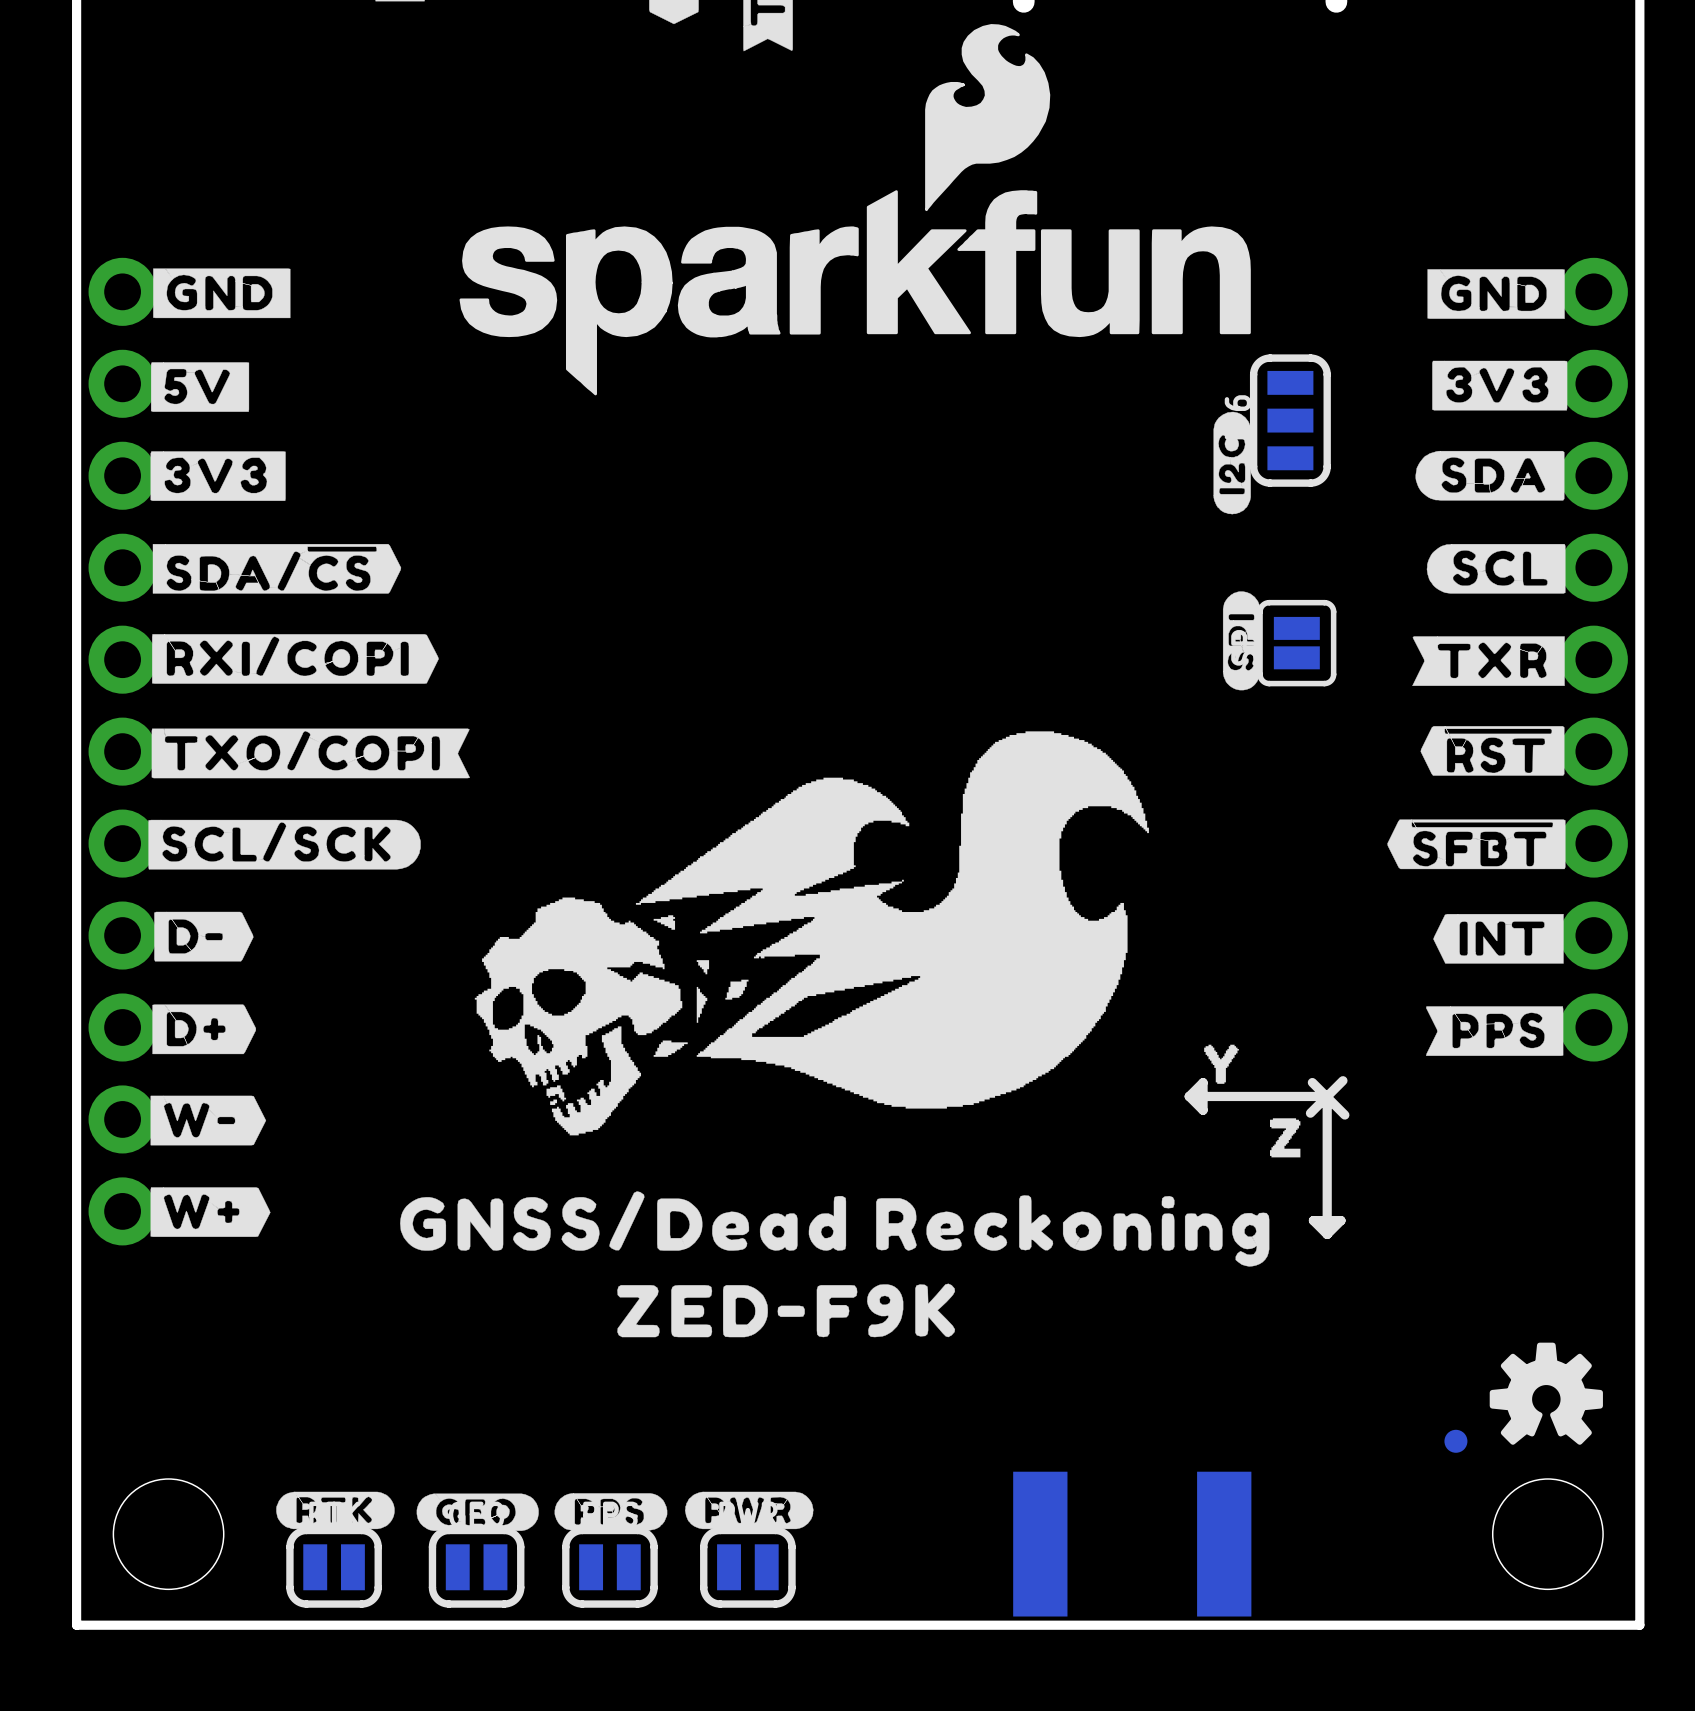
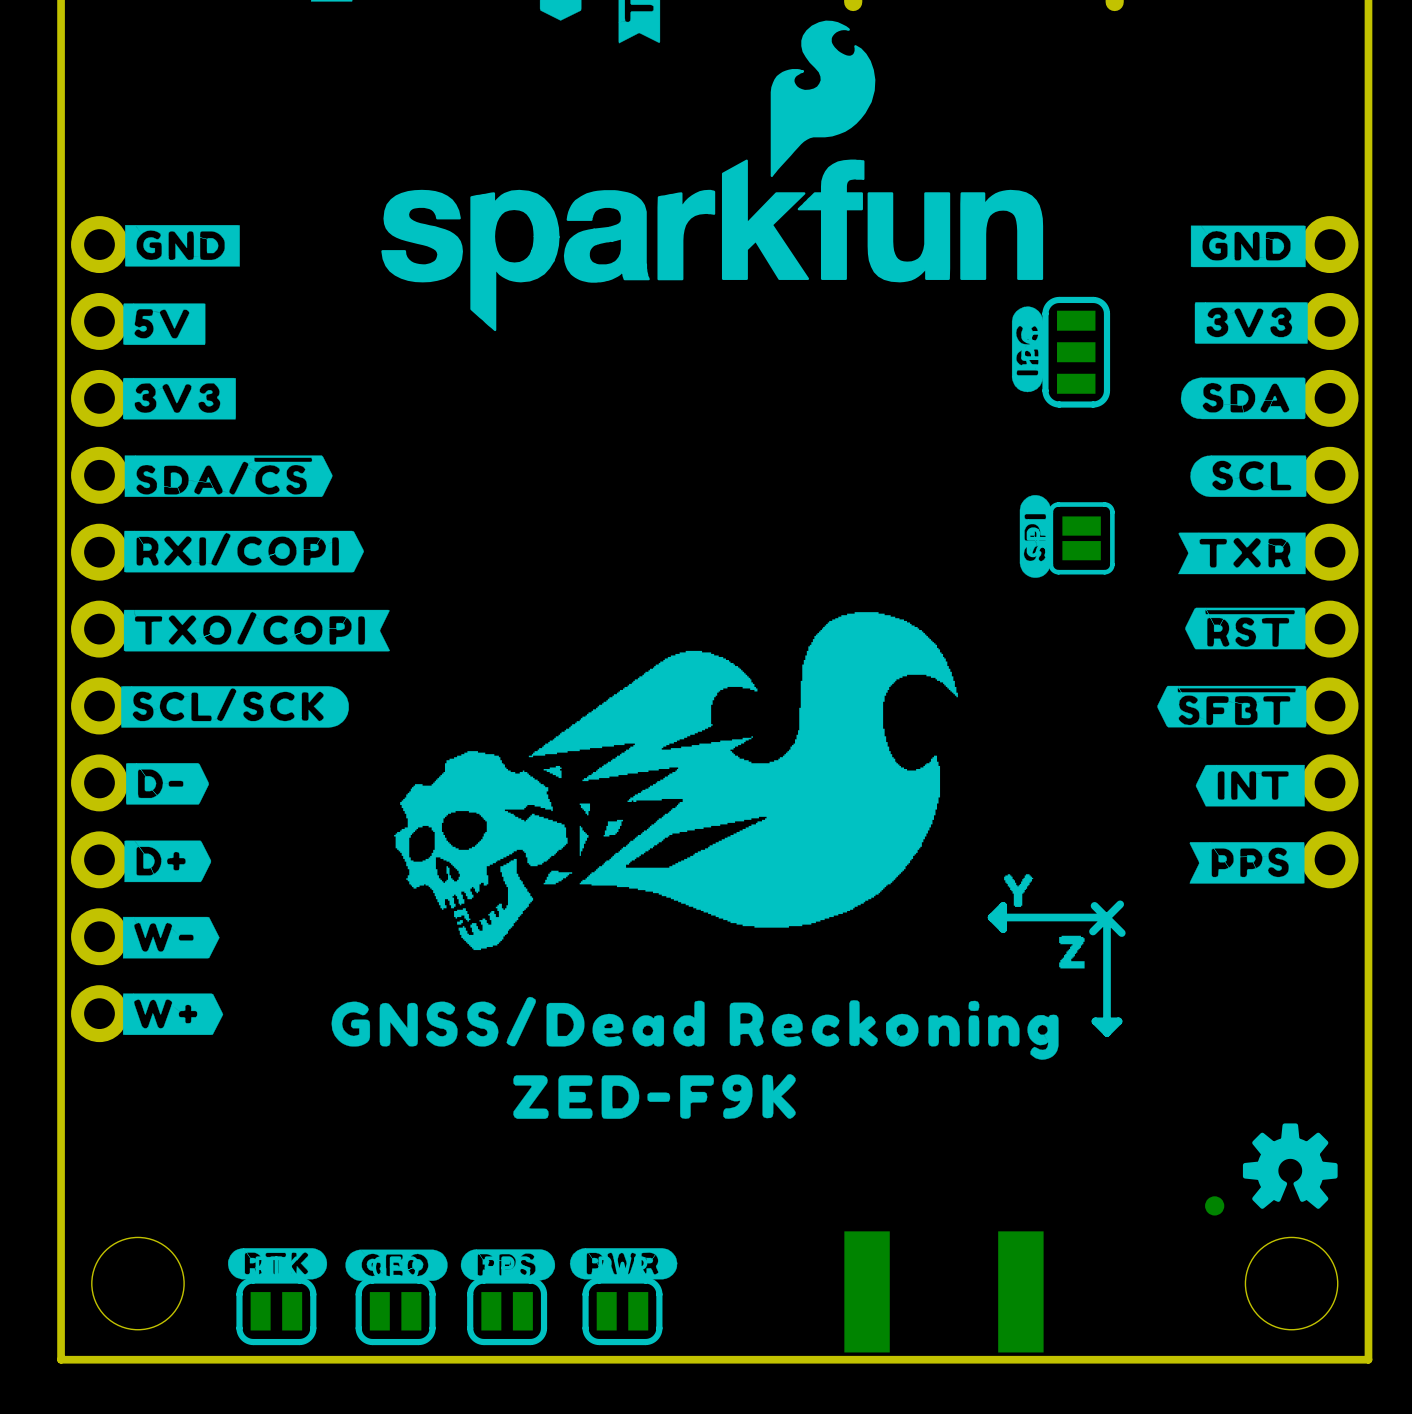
drawing position: (1232, 463) -> (1027, 349)

